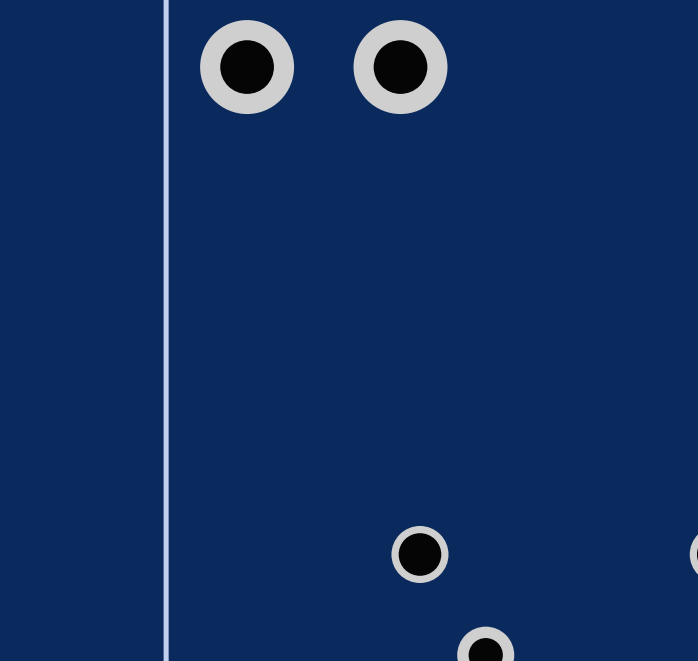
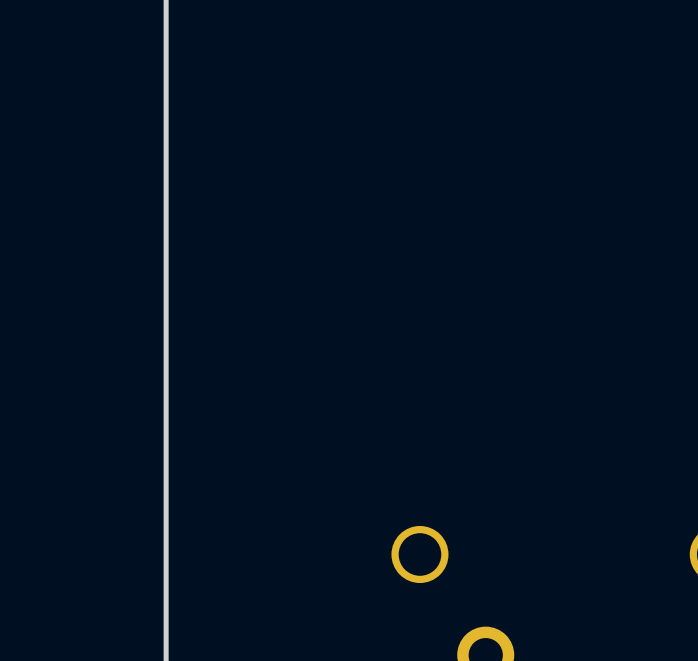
part: (247, 67) -> none
part: (400, 67) -> none

